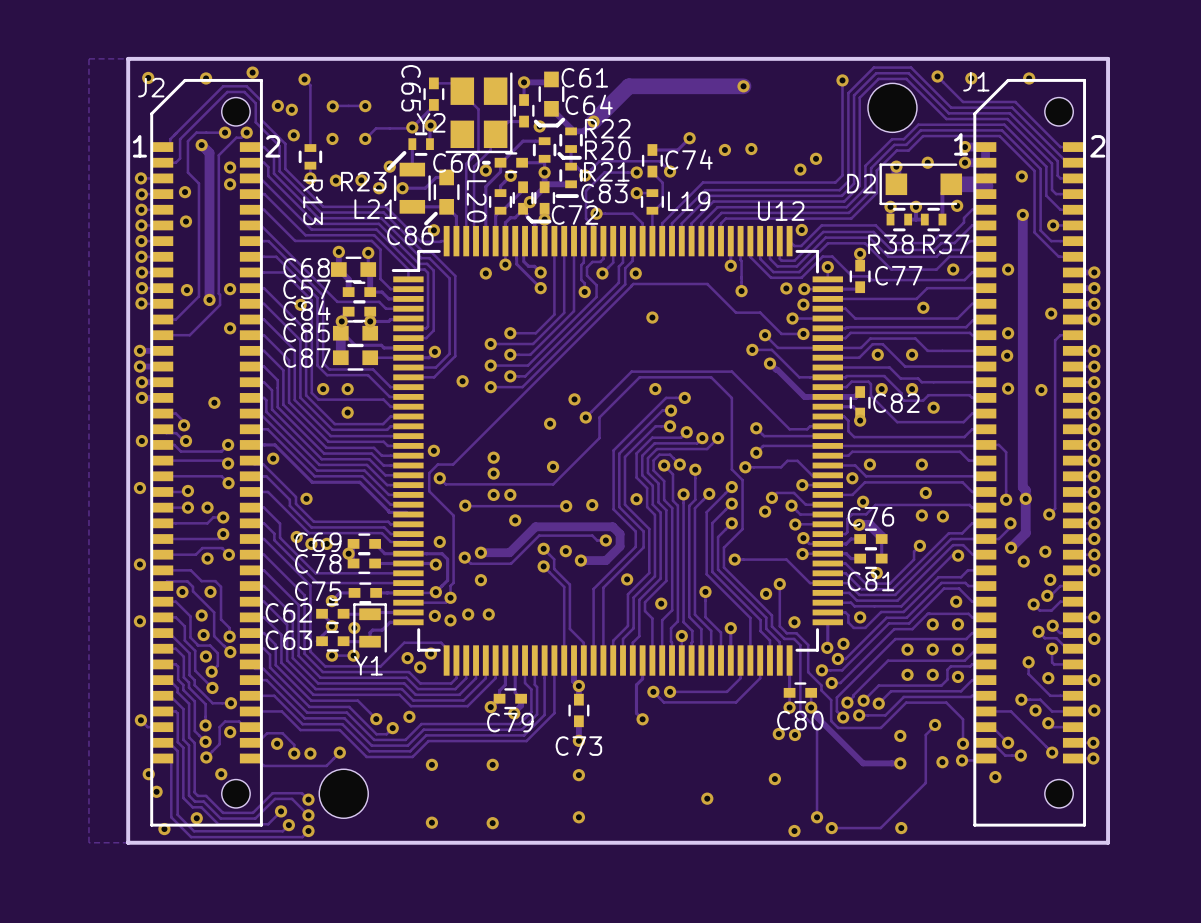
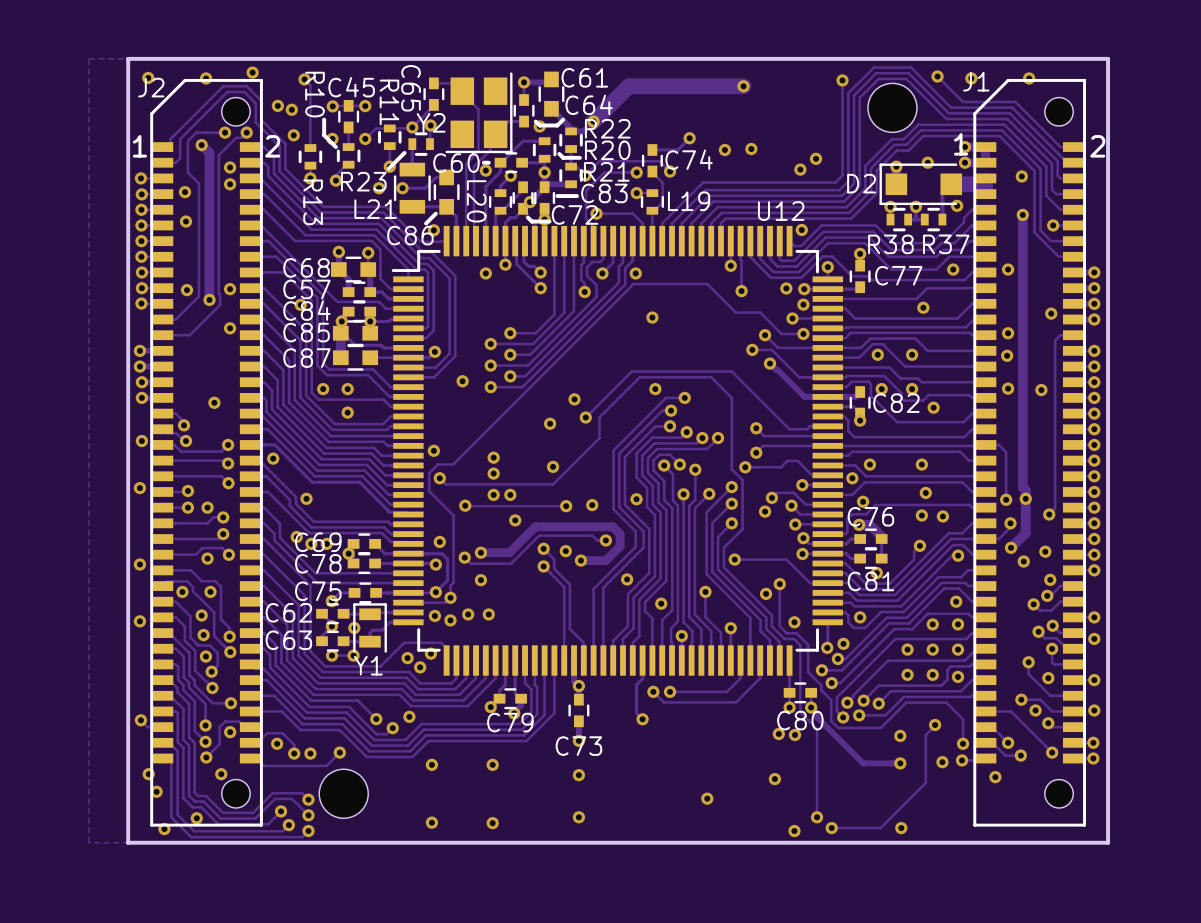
C45: none -> (348, 116)
line: none -> (324, 119) (324, 135) (335, 147)
track: none -> (348, 127) (348, 147)
R11: none -> (389, 137)
track: none -> (389, 146) (389, 166)
R10: none -> (348, 155)
track: none -> (348, 164) (335, 175)
via: (361, 180) -> none

